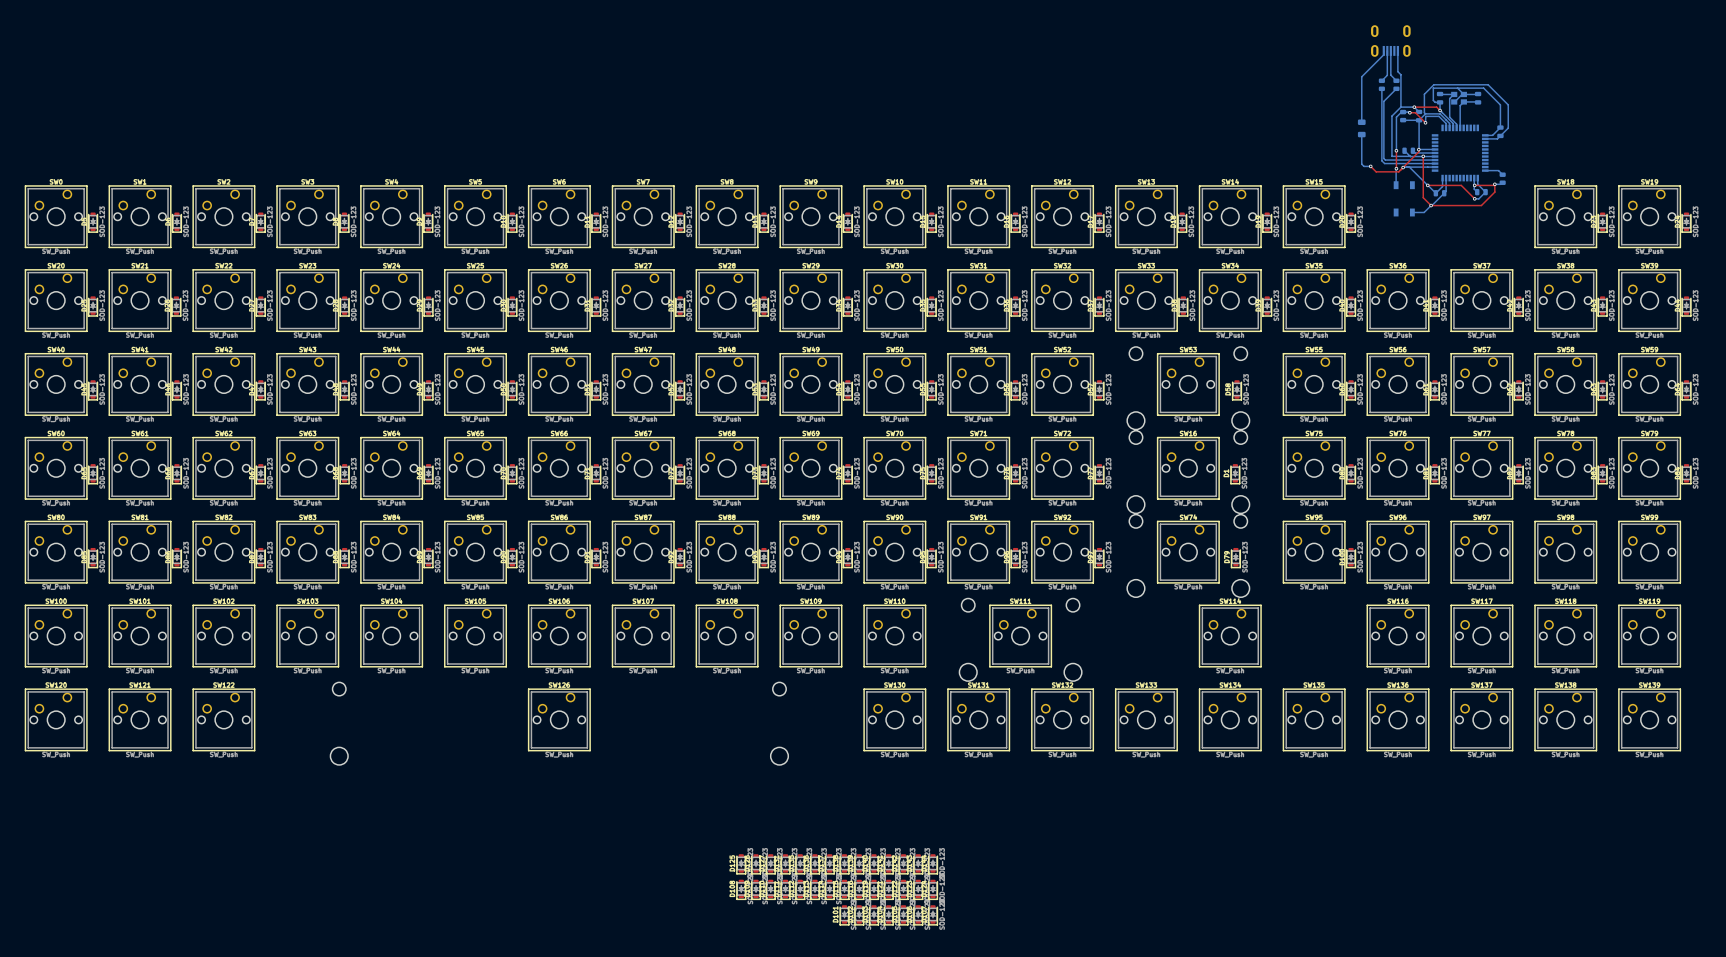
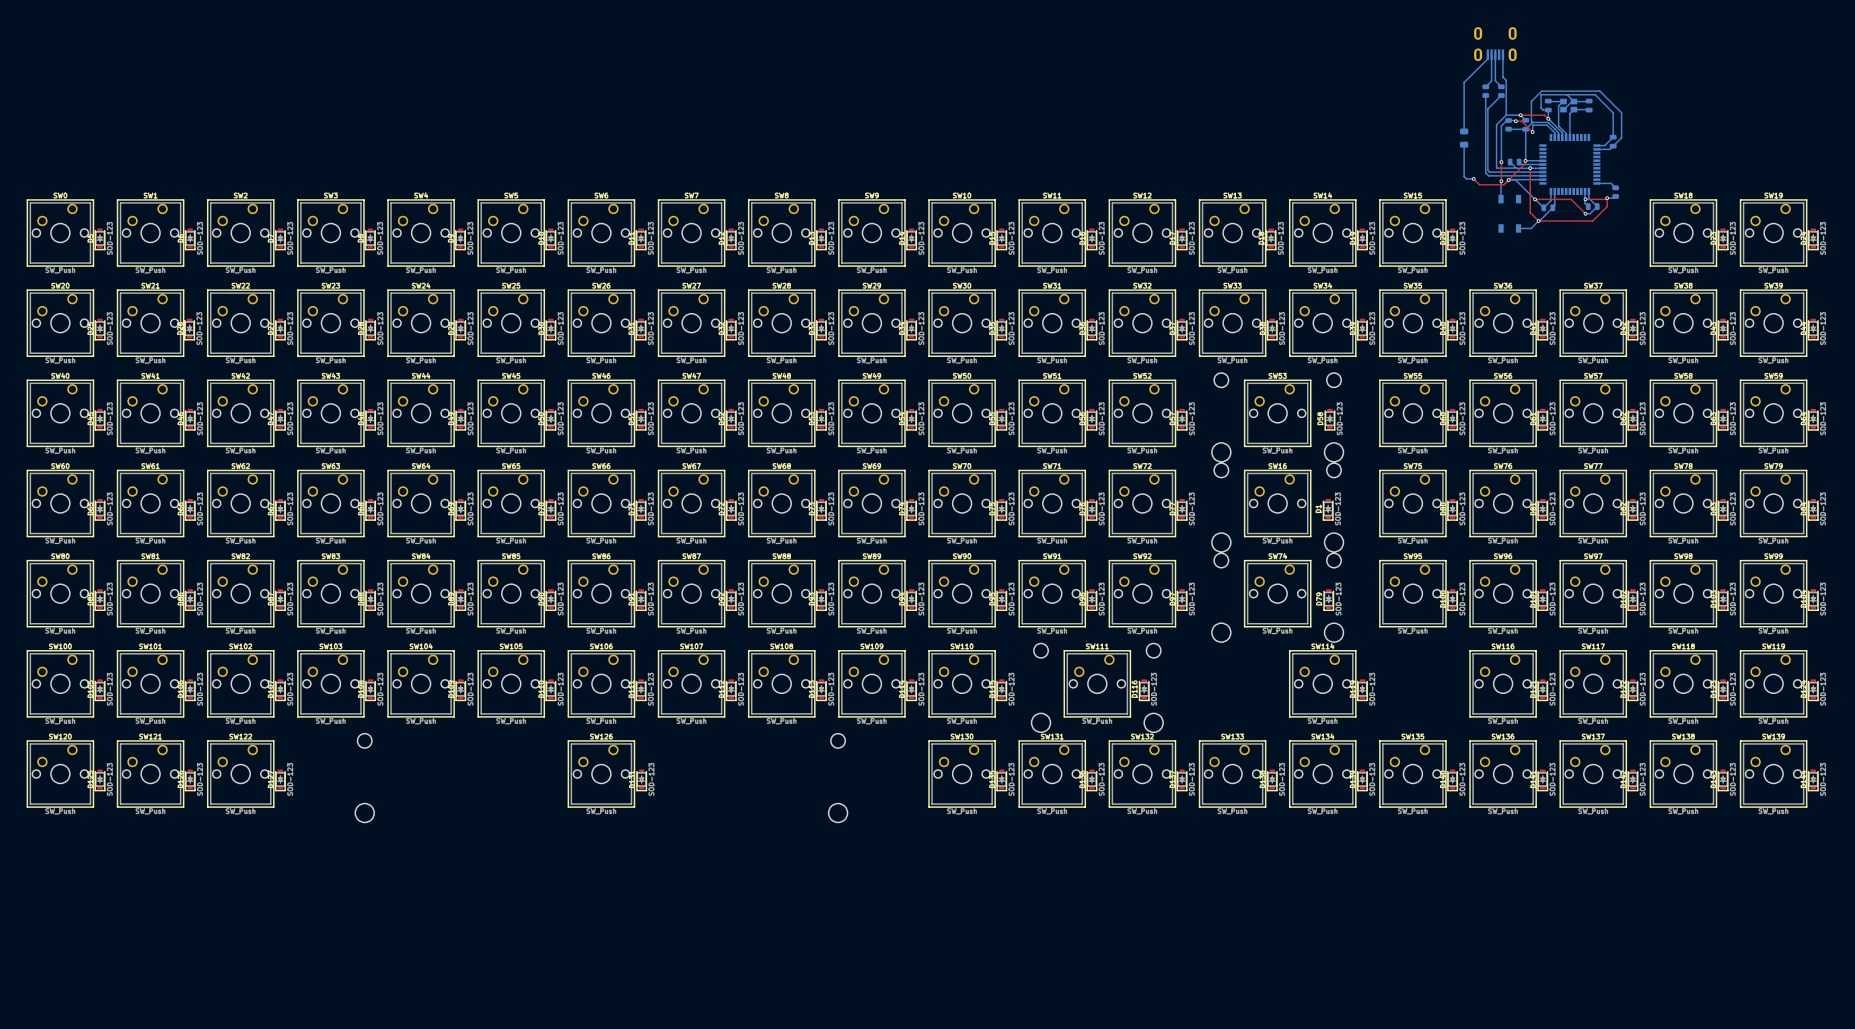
part position: (741, 864) -> (100, 780)
part position: (756, 864) -> (190, 780)
part position: (770, 864) -> (280, 780)
part position: (785, 864) -> (641, 780)
part position: (800, 864) -> (1001, 780)
part position: (815, 864) -> (1091, 780)
part position: (829, 864) -> (1182, 780)
part position: (844, 864) -> (1272, 780)
part position: (859, 864) -> (1362, 780)
part position: (874, 864) -> (1452, 780)
part position: (888, 864) -> (1542, 780)
part position: (903, 864) -> (1632, 780)
part position: (918, 864) -> (1723, 780)
part position: (933, 864) -> (1813, 780)
part position: (741, 889) -> (370, 690)
part position: (756, 889) -> (460, 690)
part position: (770, 889) -> (550, 690)
part position: (785, 889) -> (641, 690)
part position: (800, 889) -> (731, 690)
part position: (815, 889) -> (821, 690)
part position: (829, 889) -> (911, 690)
part position: (844, 889) -> (1001, 690)
part position: (859, 889) -> (1144, 690)
part position: (874, 889) -> (1362, 690)
part position: (888, 889) -> (1542, 690)
part position: (903, 889) -> (1632, 690)
part position: (918, 889) -> (1723, 690)
part position: (933, 889) -> (1813, 690)
part position: (844, 915) -> (1542, 599)
part position: (859, 915) -> (1632, 599)
part position: (874, 915) -> (1723, 599)
part position: (888, 915) -> (1813, 599)
part position: (903, 915) -> (100, 690)
part position: (918, 915) -> (190, 690)
part position: (933, 915) -> (280, 690)

